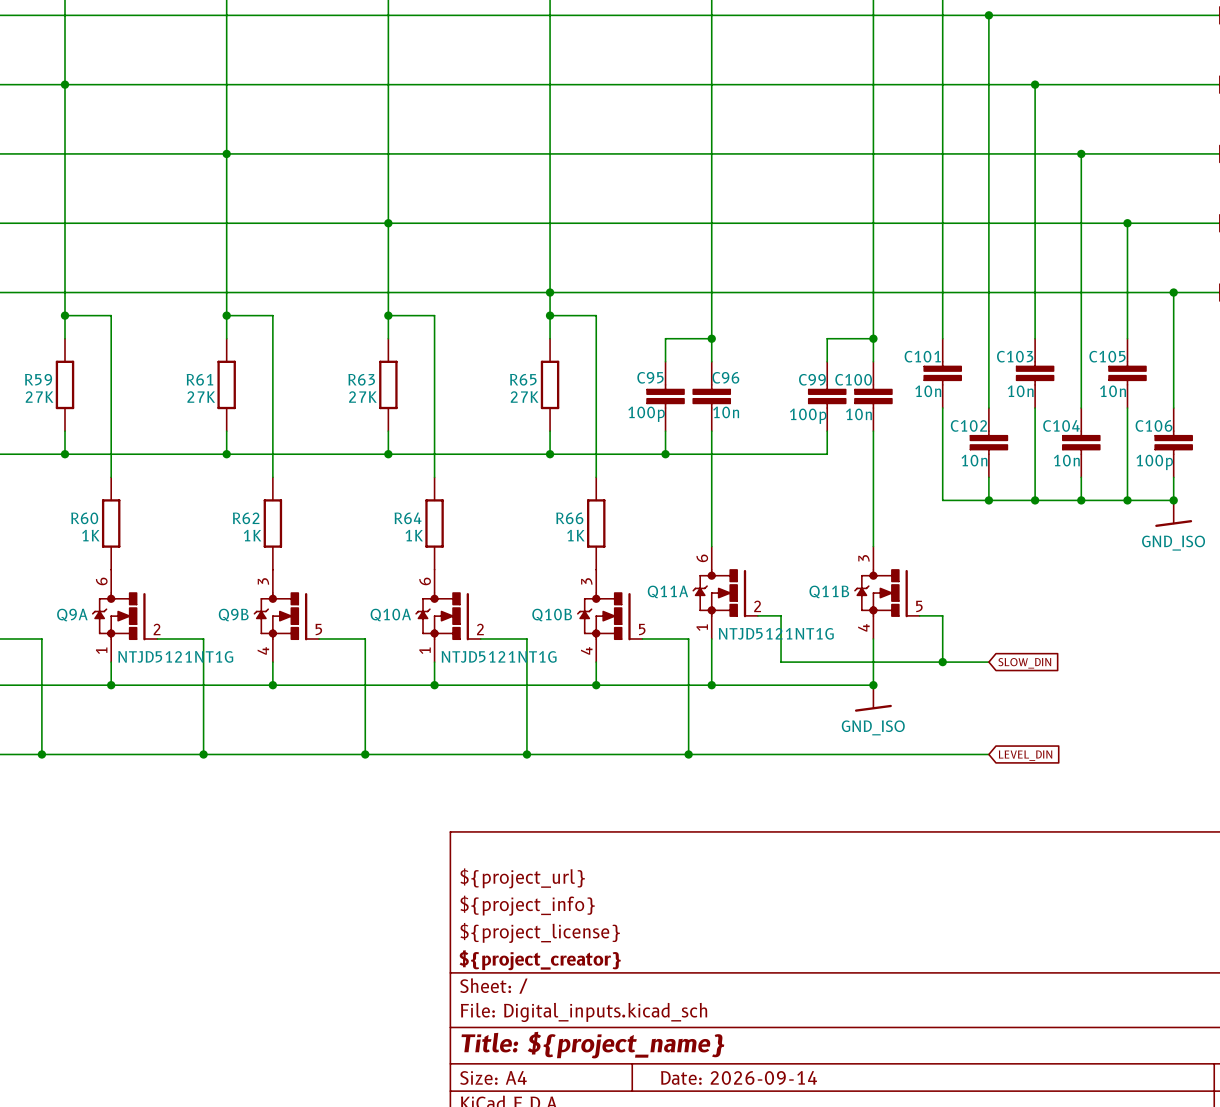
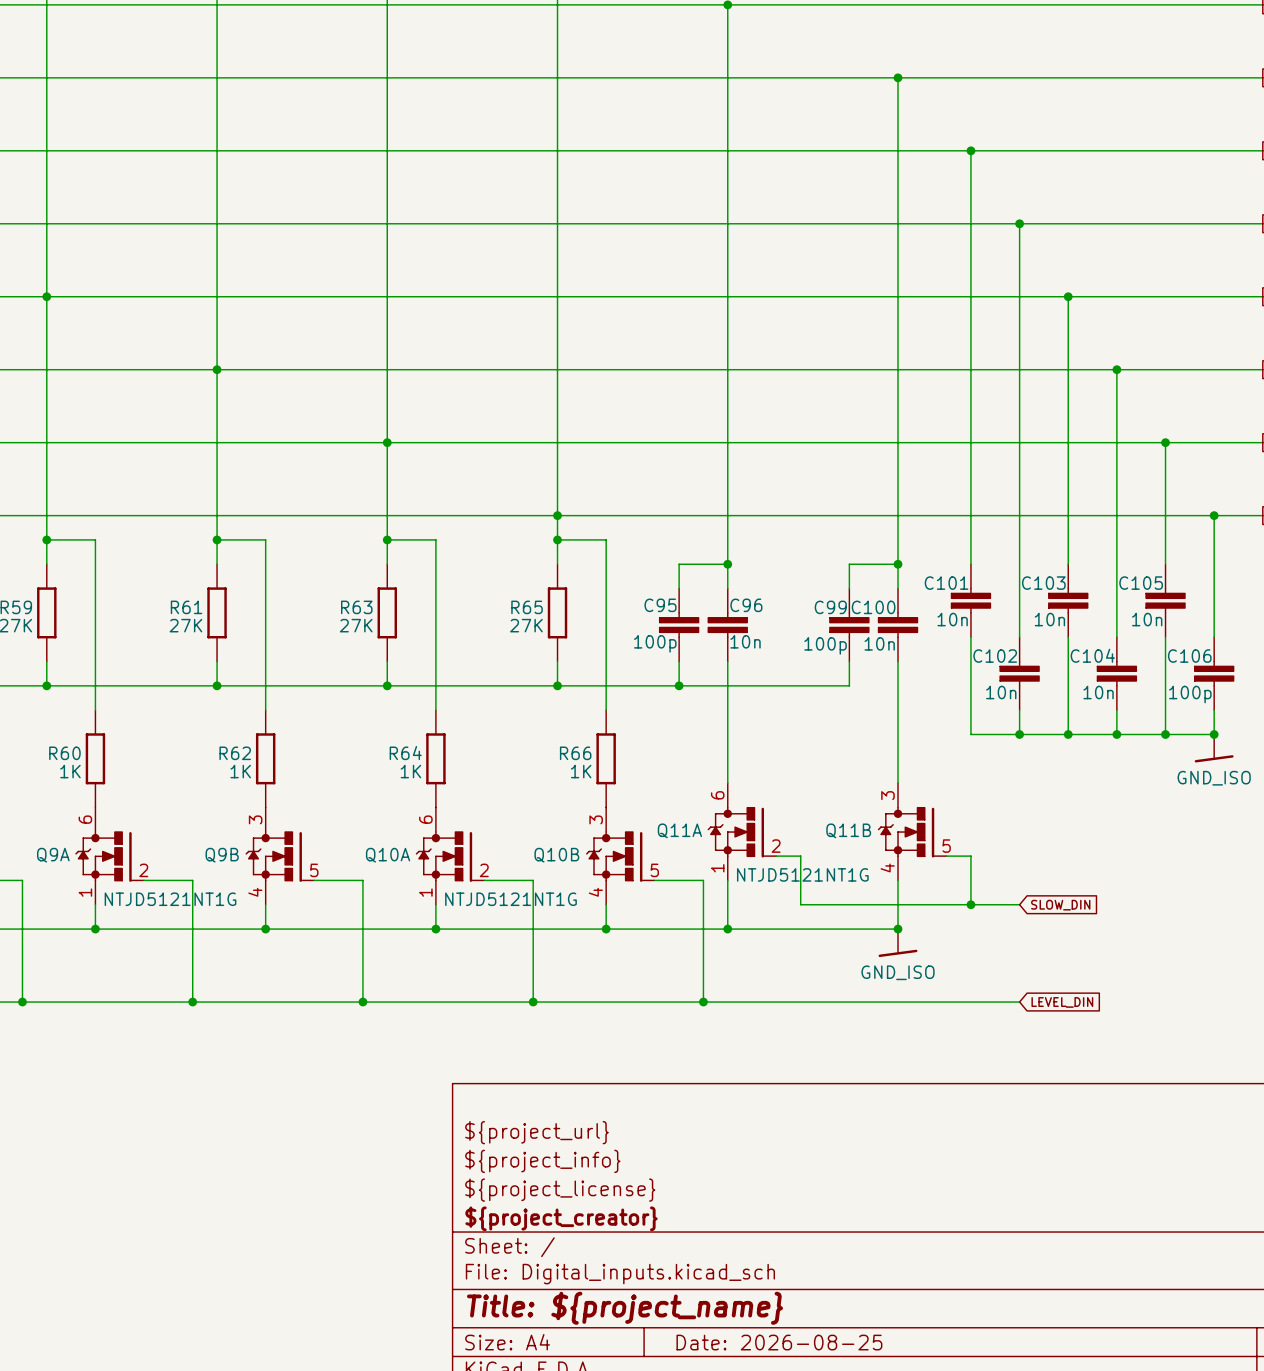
title block: Date: 2026-09-14 (739, 1077) -> Date: 2026-08-25 (779, 1342)

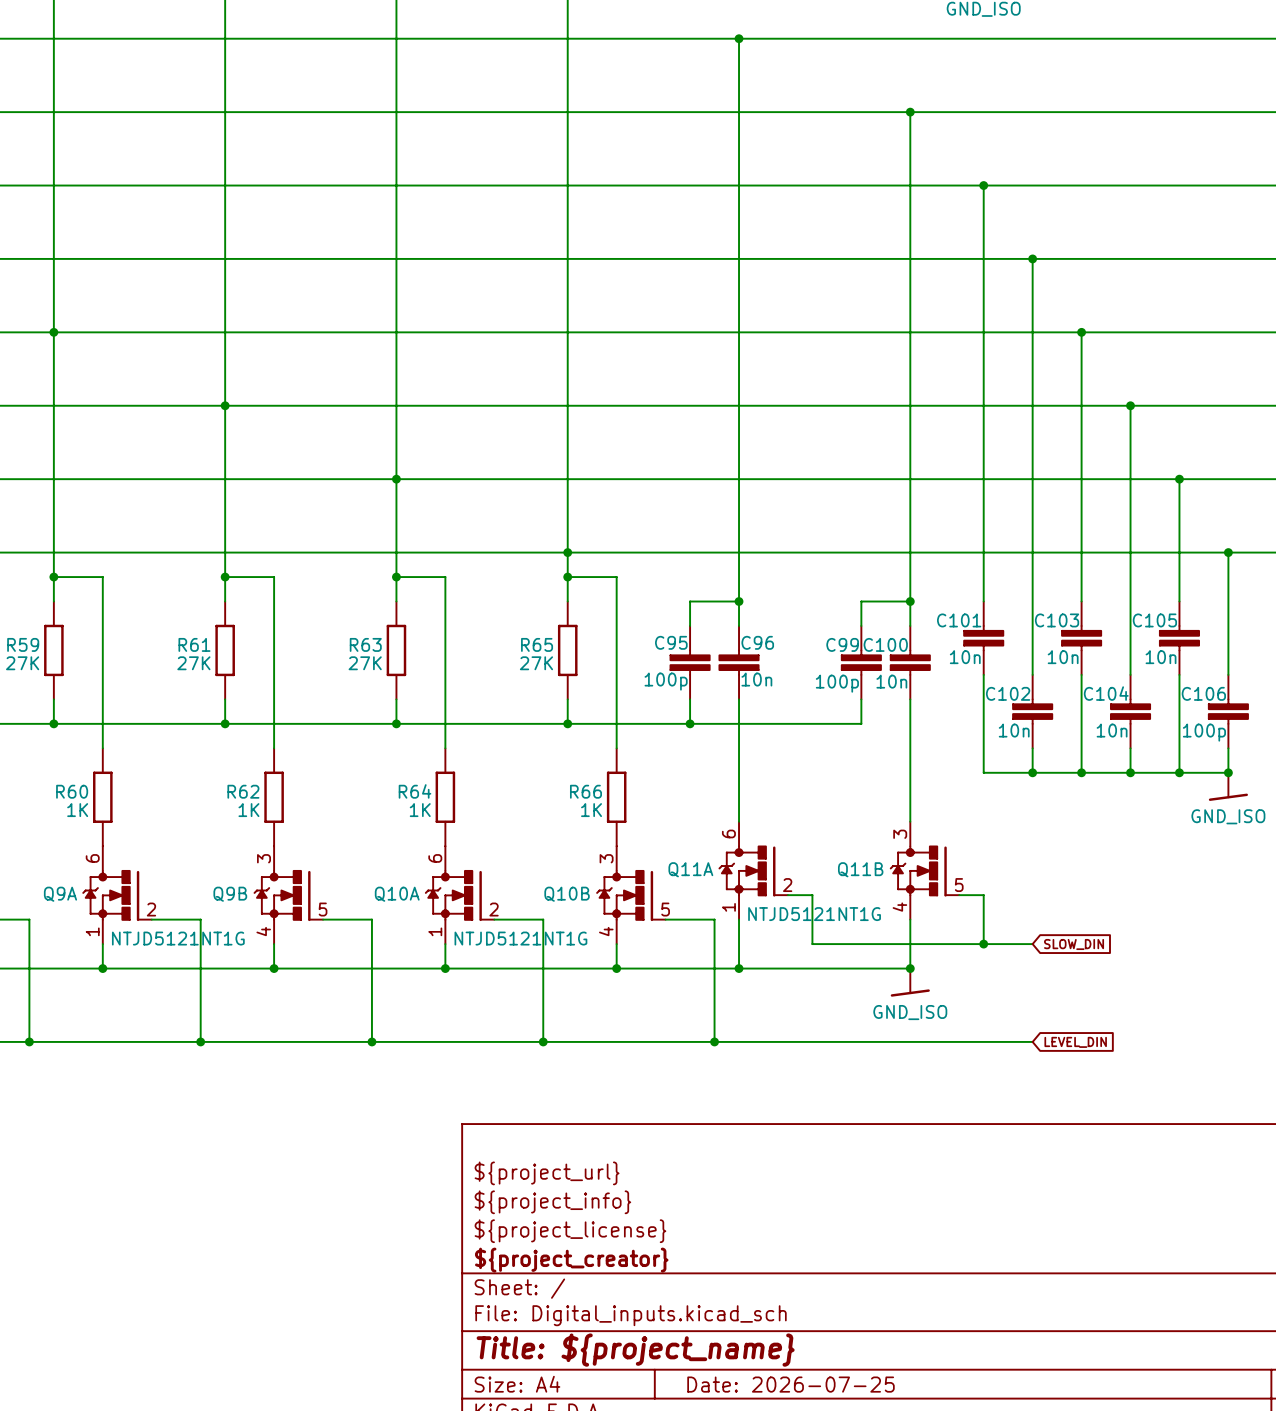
title block: Date: 2026-08-25 (779, 1342) -> Date: 2026-07-25 (791, 1384)

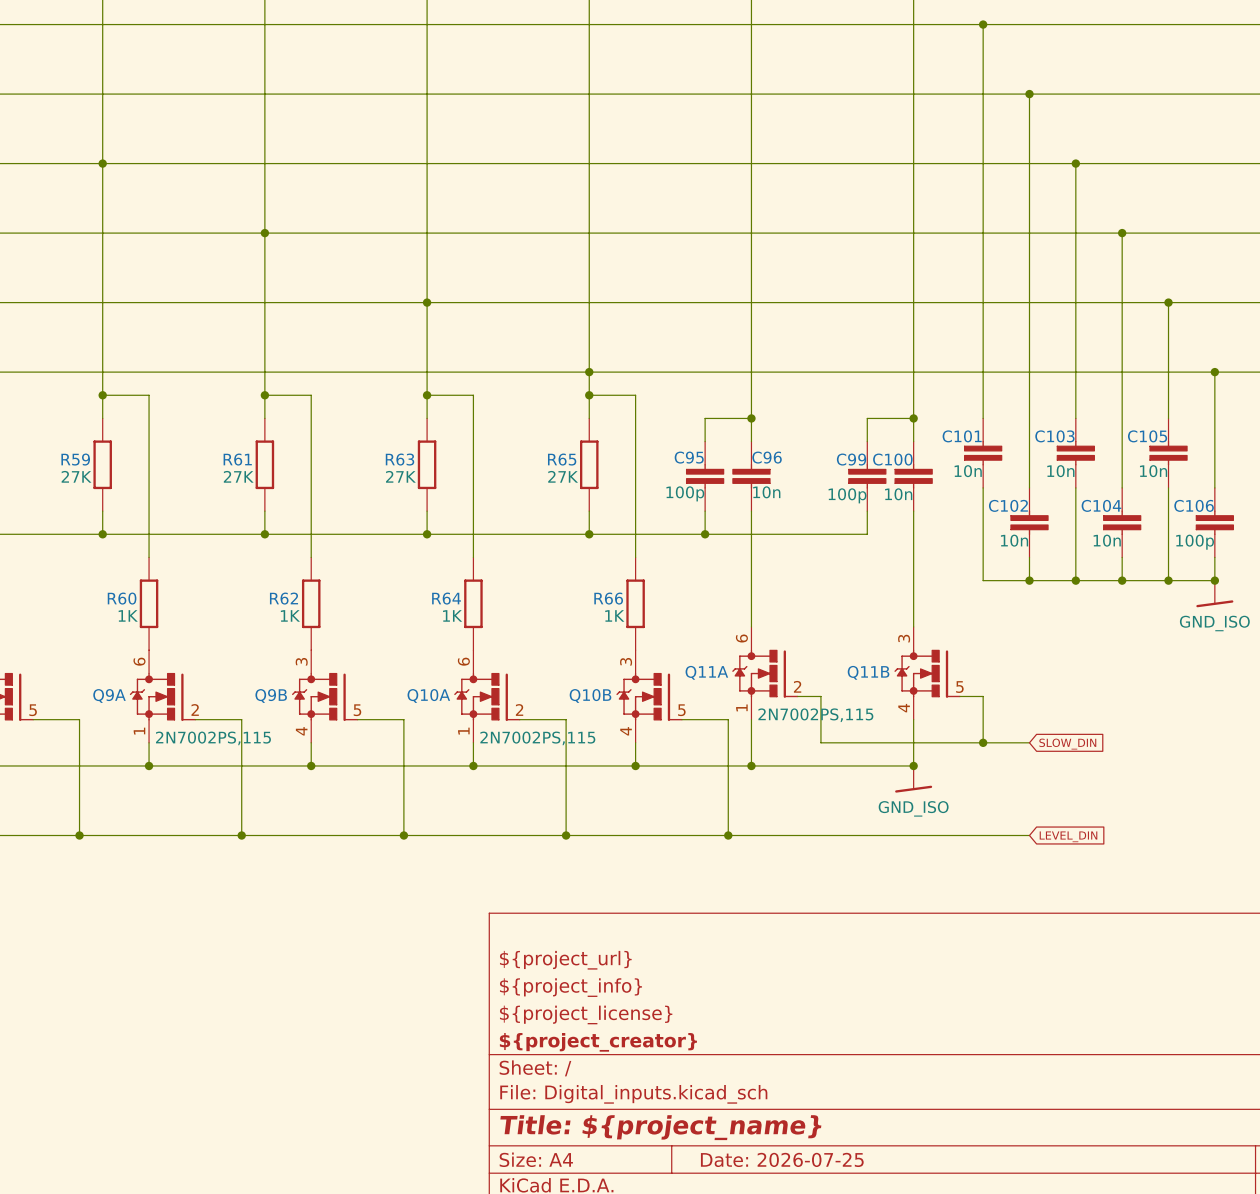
Q11A value: NTJD5121NT1G (814, 914) -> 2N7002PS,115 (815, 715)
Q9A value: NTJD5121NT1G (178, 938) -> 2N7002PS,115 (213, 738)
Q10A value: NTJD5121NT1G (520, 938) -> 2N7002PS,115 (537, 738)

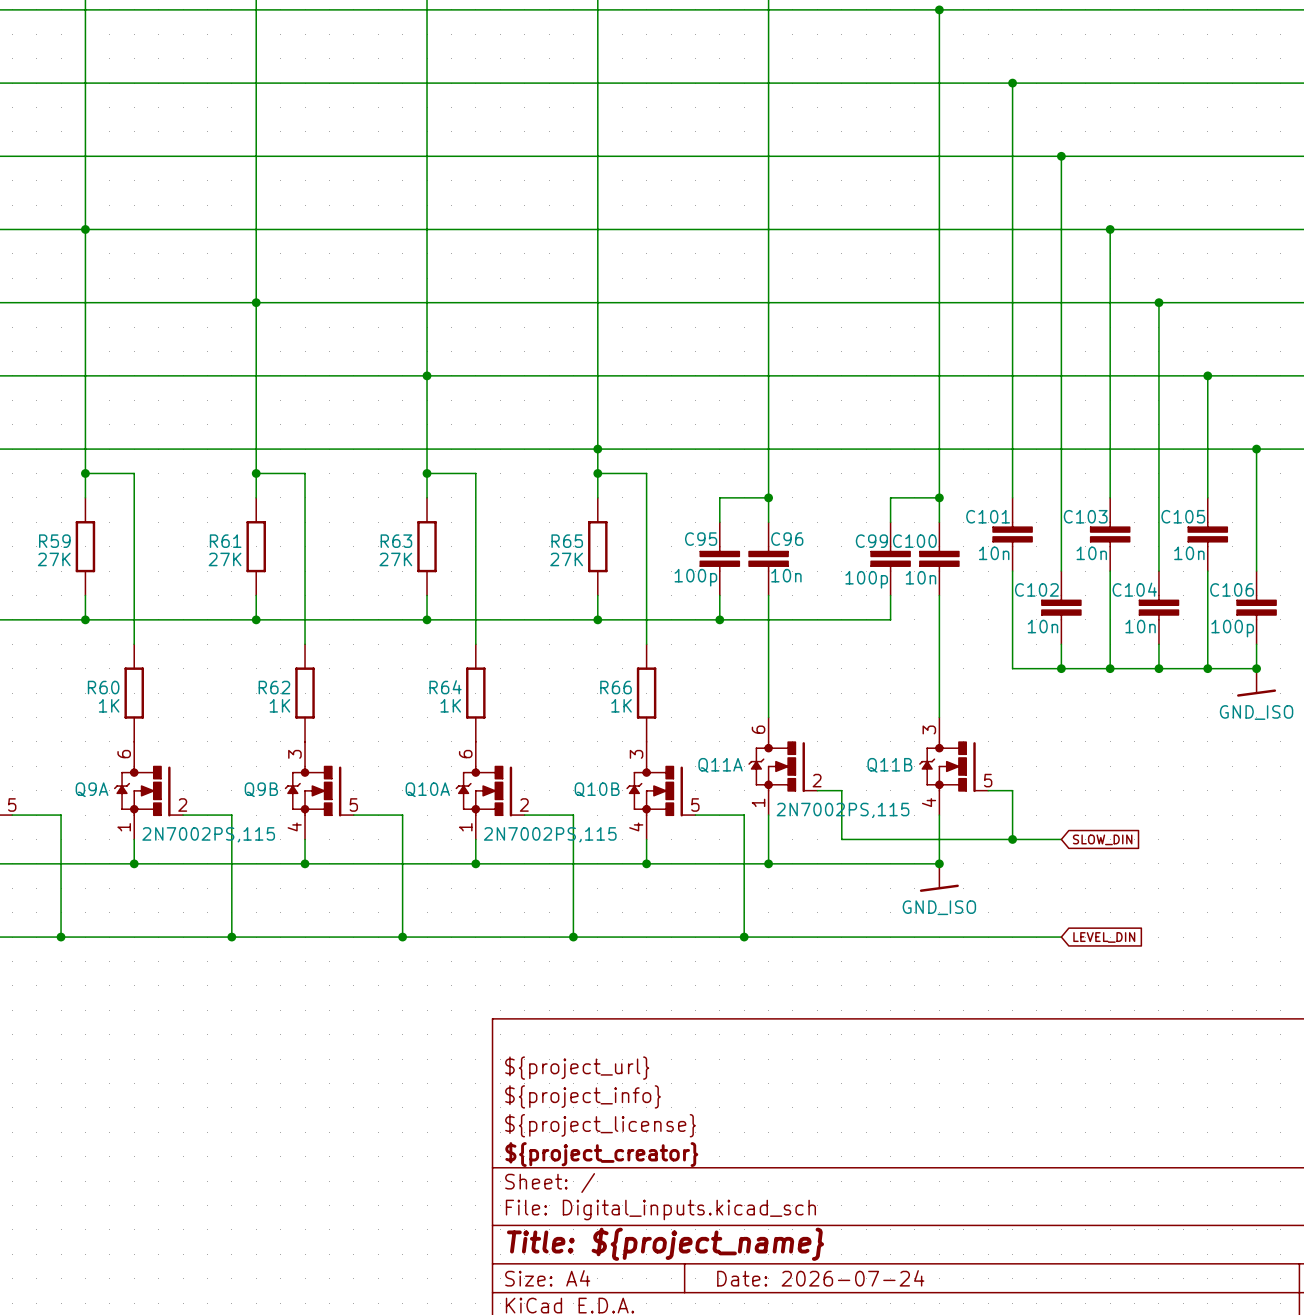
title block: Date: 2026-07-25 (782, 1159) -> Date: 2026-07-24 (820, 1278)

